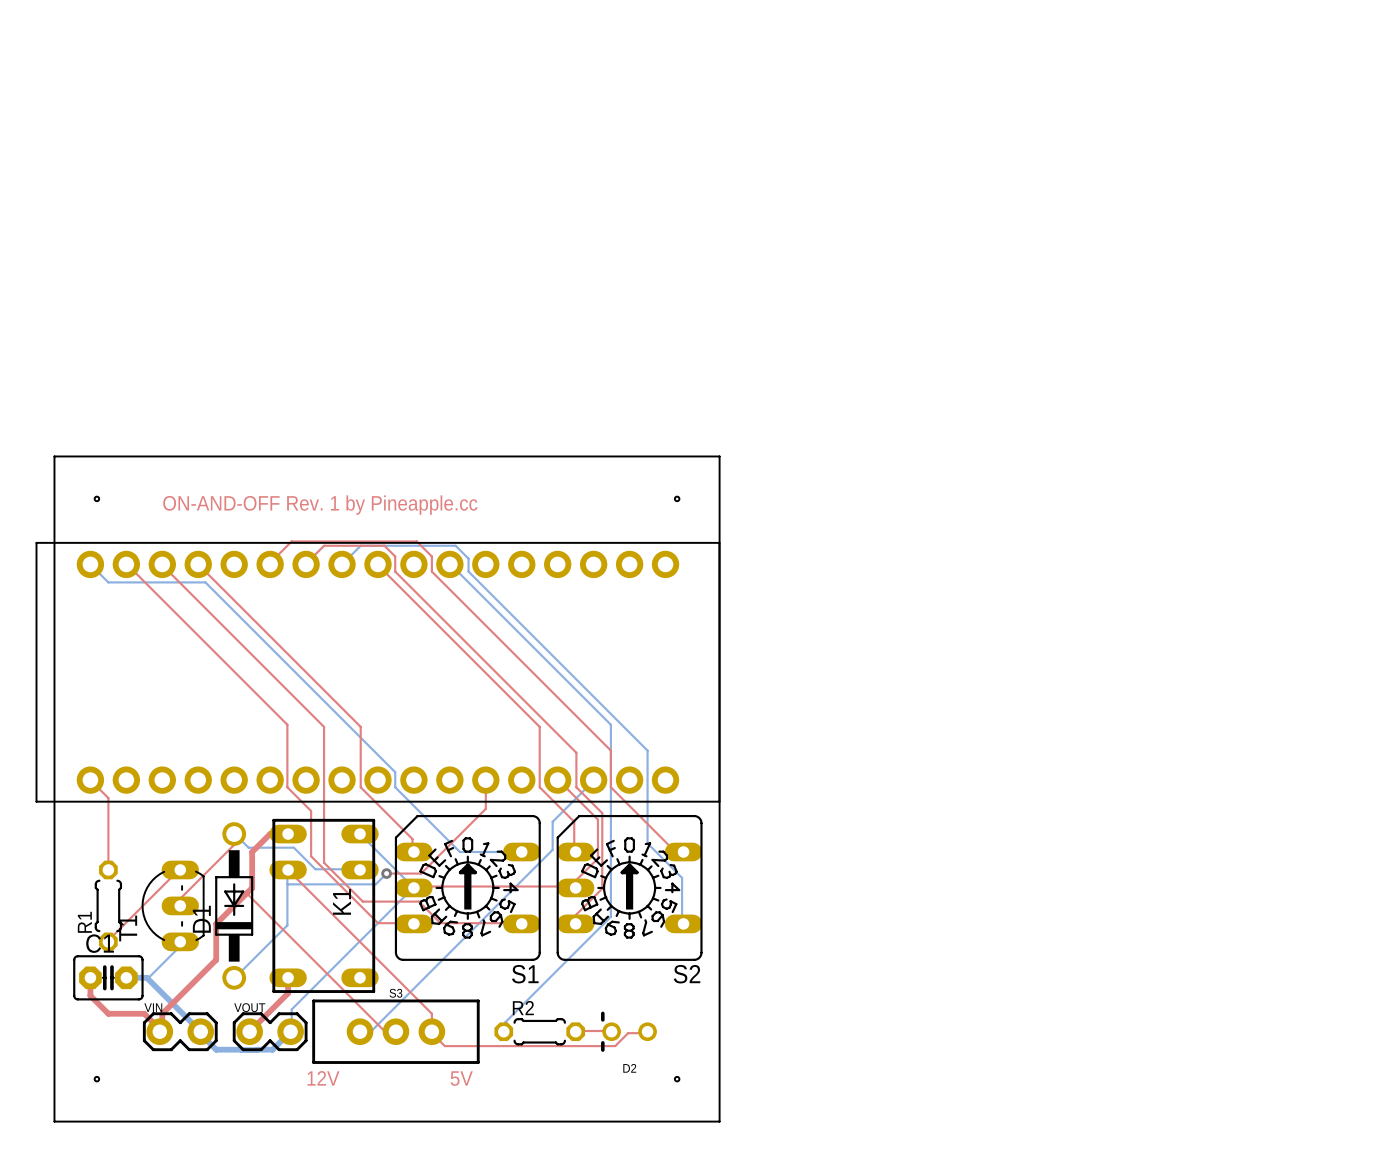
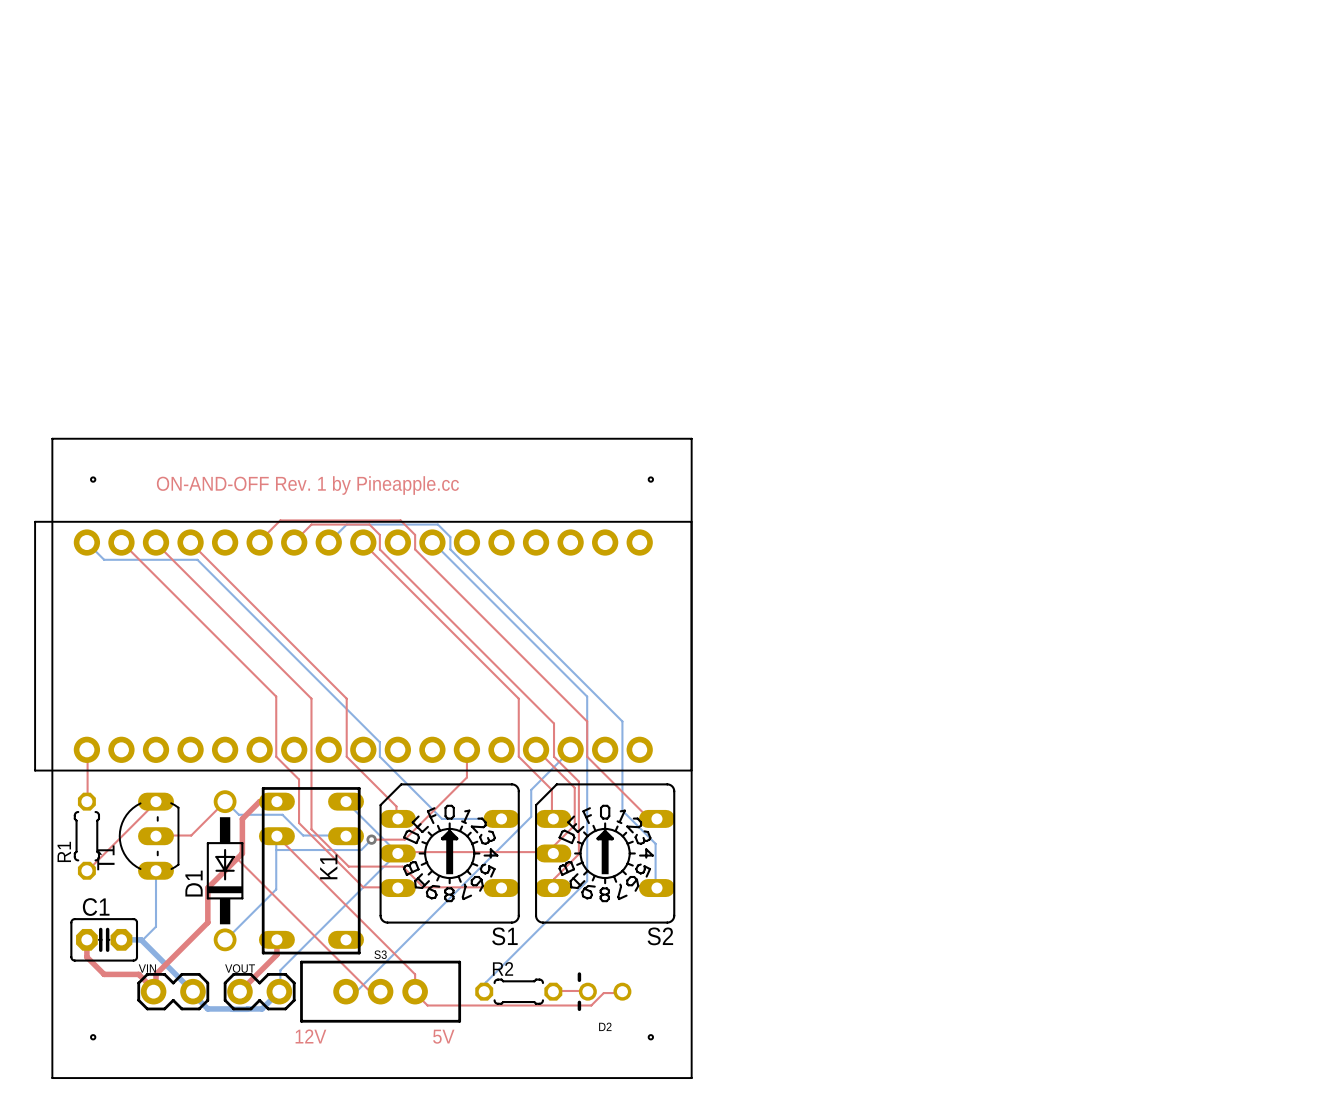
top track: (91, 780) (108, 798) (108, 869) -> (87, 750) (86, 801)
top track: none -> (156, 801) (86, 870)
top track: (233, 834) (233, 845) (181, 897) (180, 905) -> (224, 802) (191, 835) (156, 836)
top track: (180, 869) (108, 941) -> none
R1 position: (108, 905) -> (86, 836)
T1 position: (173, 905) -> (149, 836)
bottom track: (180, 941) (179, 946) (162, 964) -> (156, 870) (156, 926)

